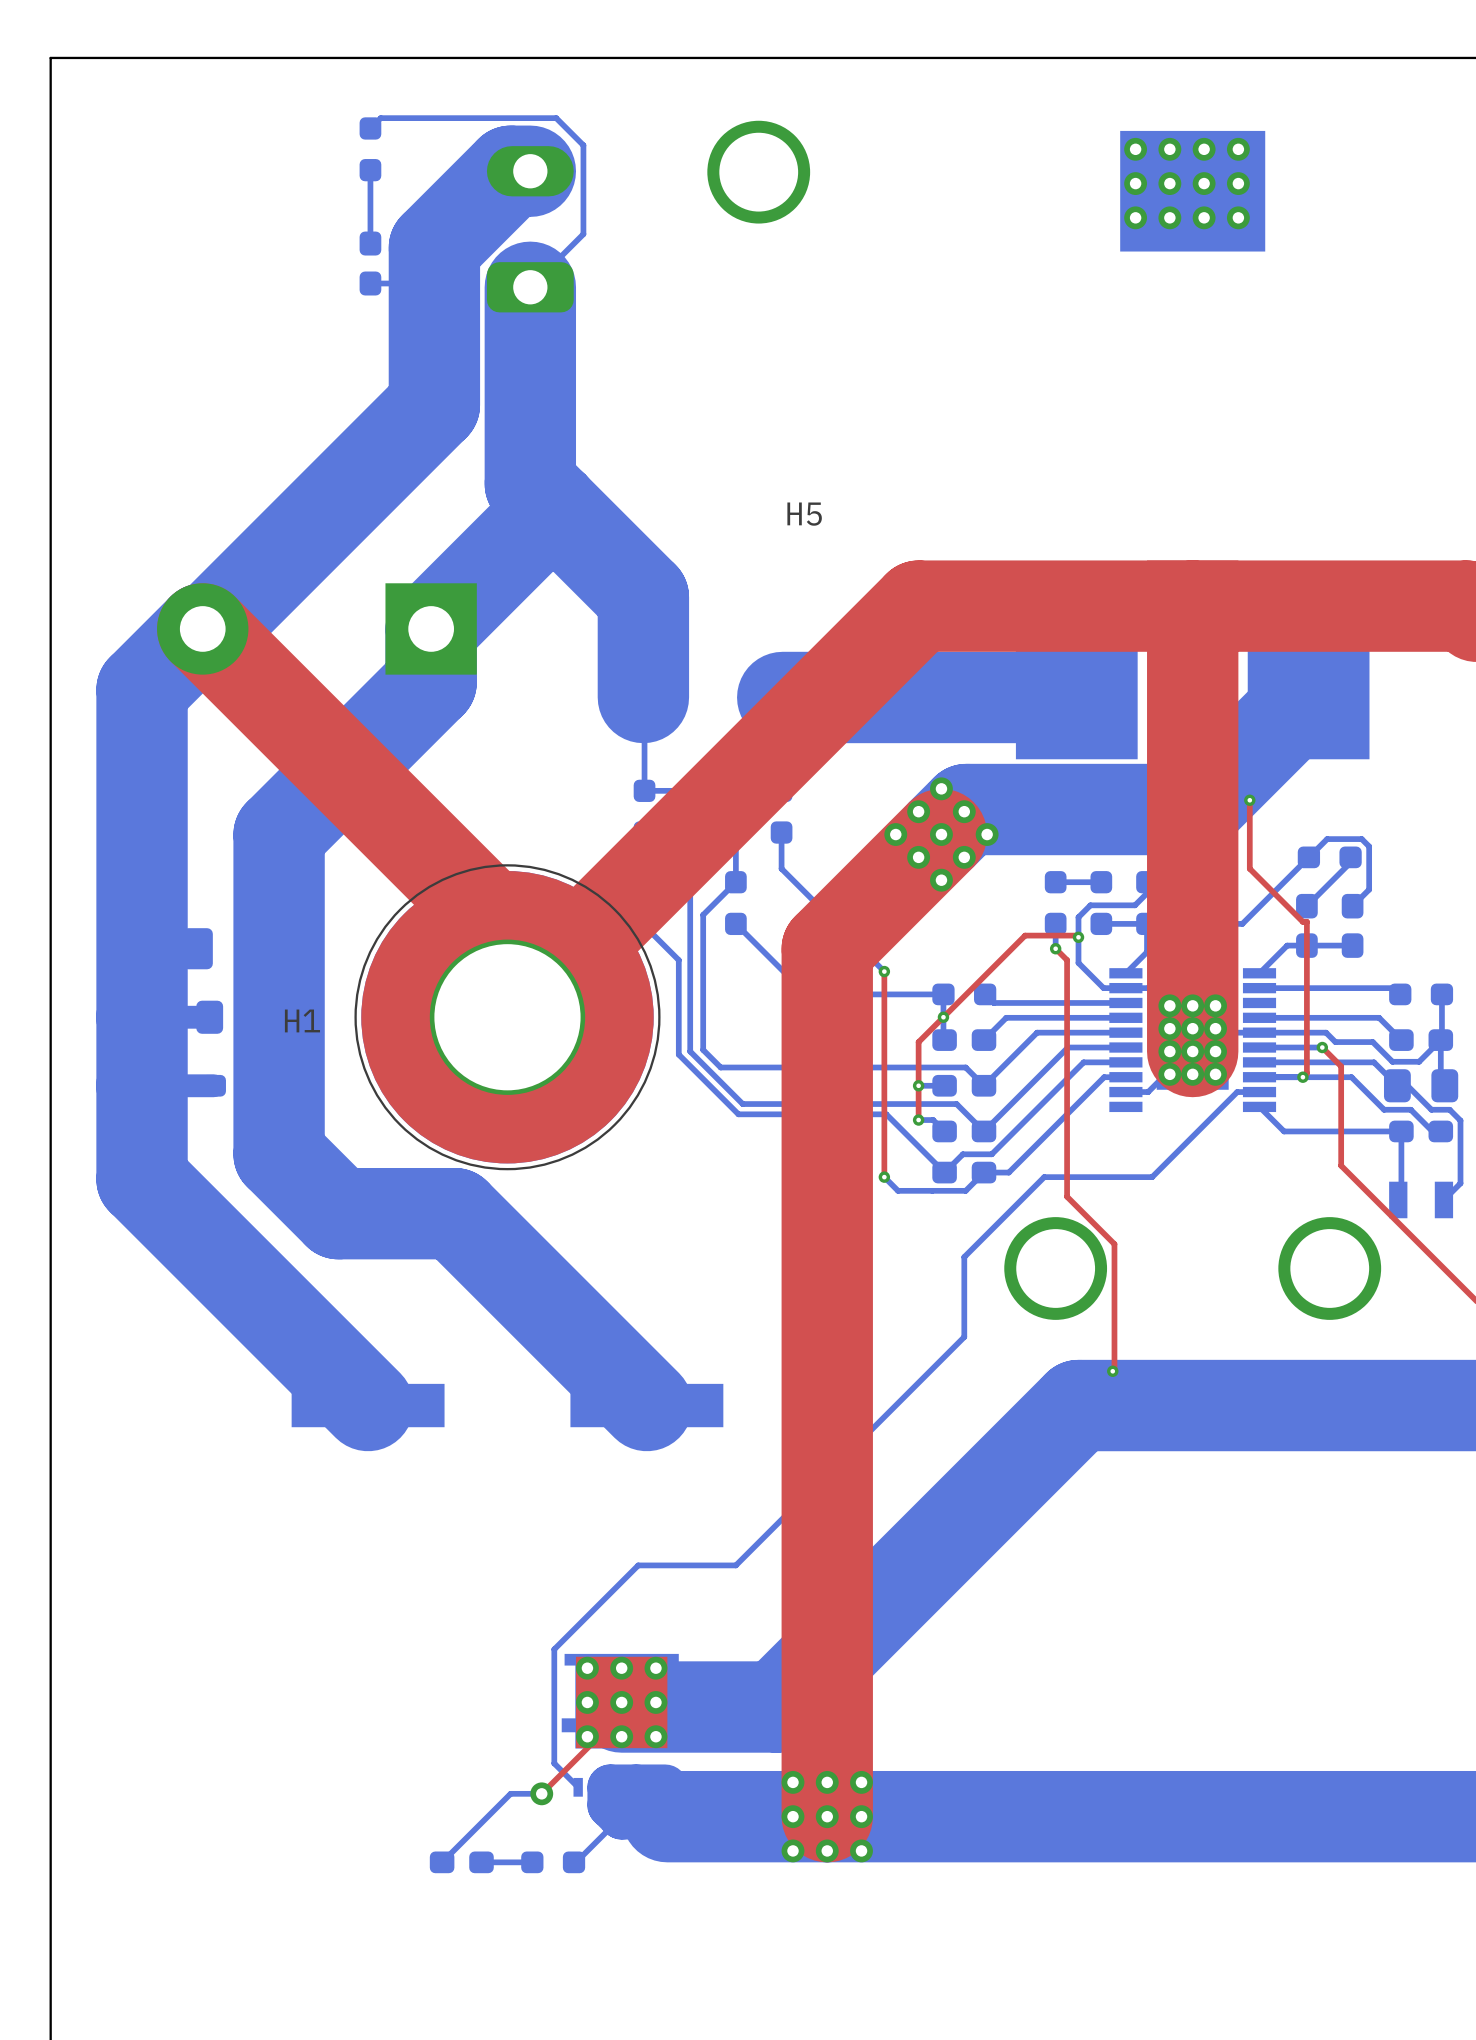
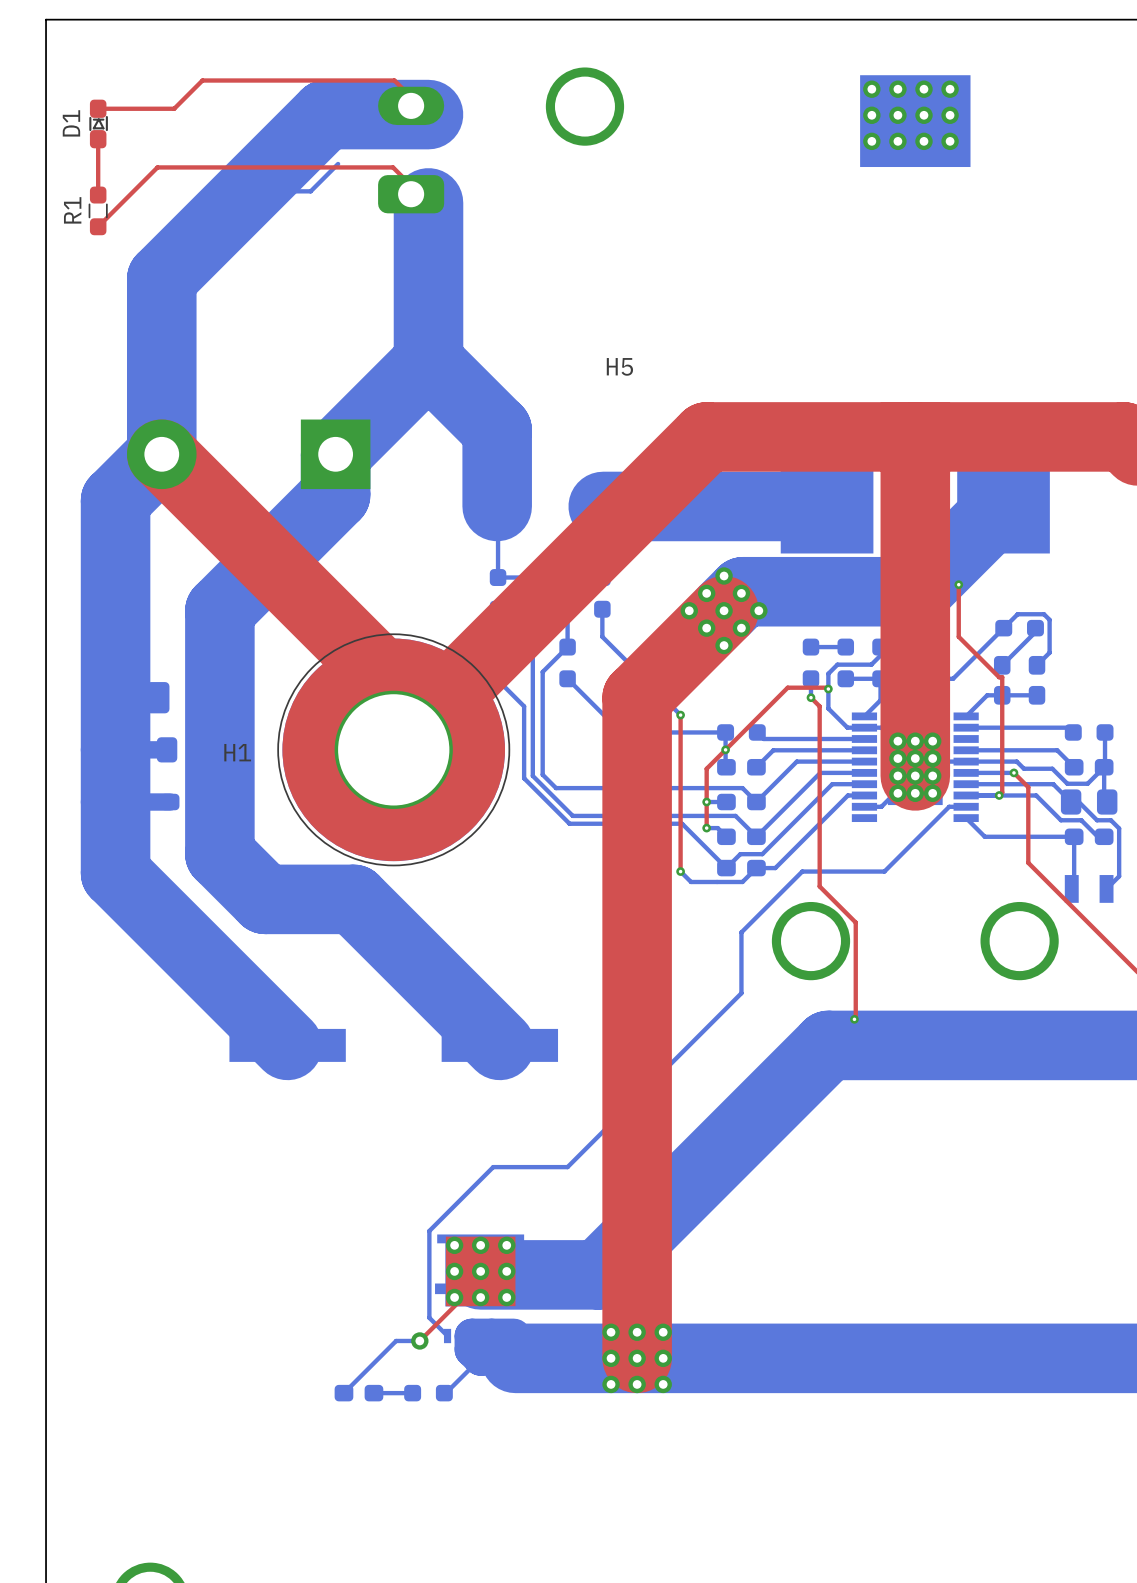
bottom track: (370, 128) (380, 118) (556, 118) (583, 145) (583, 234) (530, 287) (530, 484) (553, 506) -> (428, 202) (428, 361)
R1 side: bottom (370, 149) -> top (98, 210)
bottom track: (370, 170) (370, 243) -> none
bottom track: (530, 171) (510, 171) (434, 247) (434, 405) (210, 628) (202, 628) -> (428, 114) (325, 114) (161, 278) (161, 454)
top track: none -> (98, 108) (174, 108) (202, 80) (394, 80) (428, 114)
top track: none -> (98, 139) (98, 195)
D1 side: bottom (370, 263) -> top (98, 123)
top track: none -> (428, 202) (393, 167) (157, 167) (98, 226)

